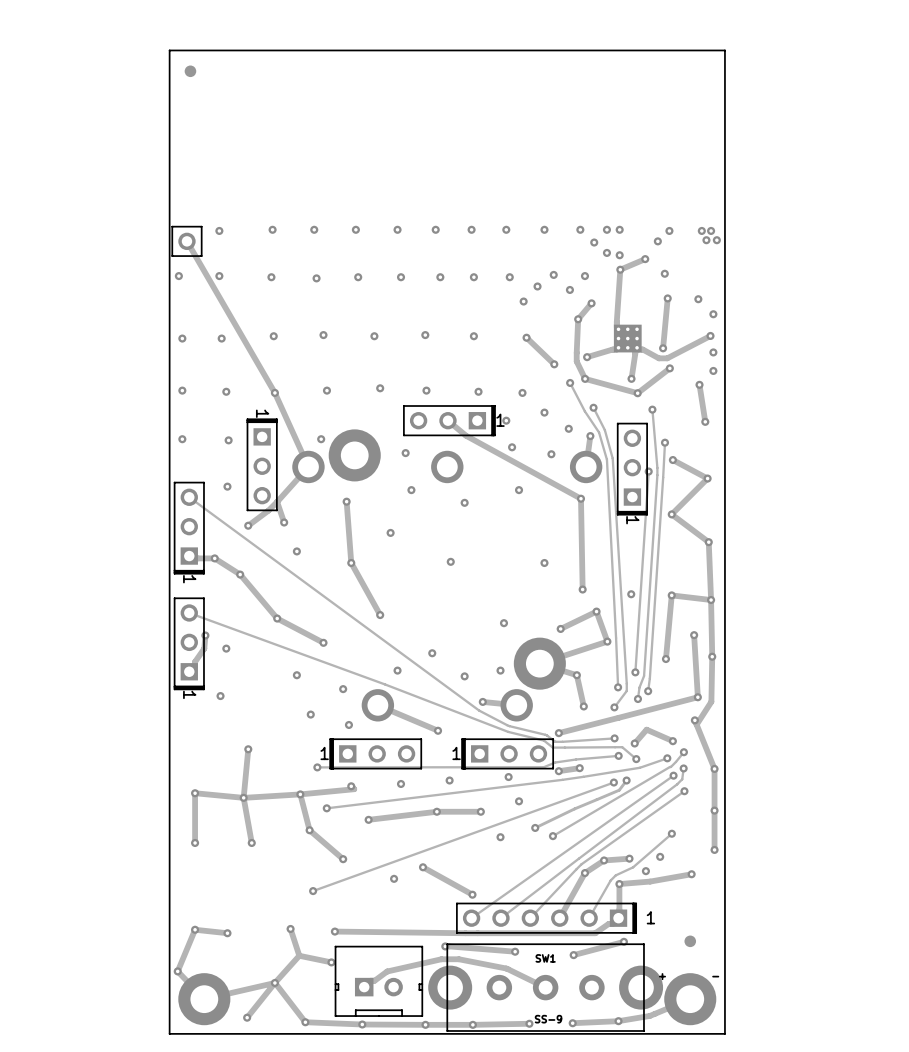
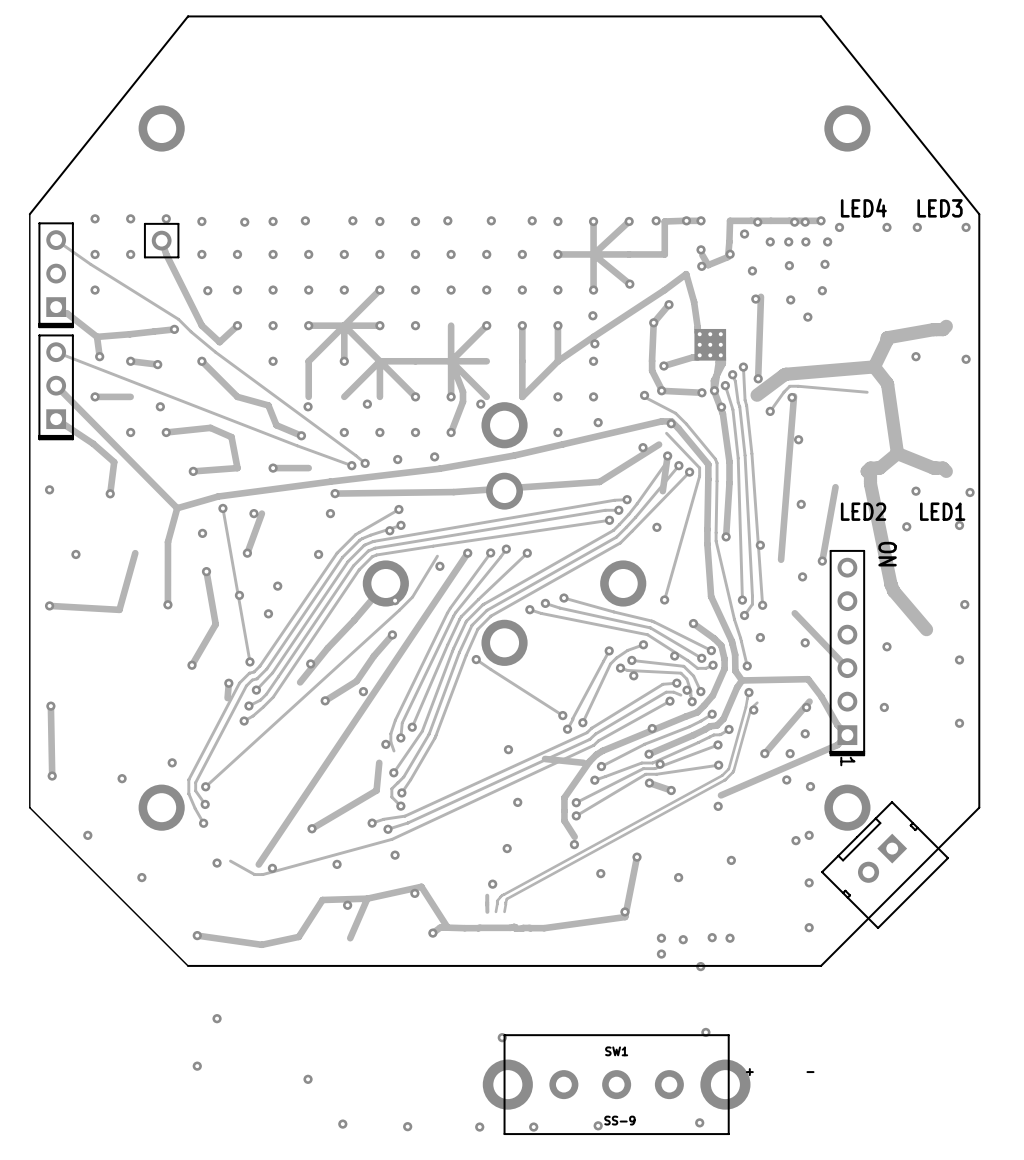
board edge: (724, 50) (724, 1033) (169, 1033) (169, 50) -> (821, 16) (979, 214) (979, 807) (821, 965) (188, 965) (29, 807) (29, 214) (188, 16)
part: (190, 71) -> none
part: none -> (161, 128)
part: none -> (847, 128)
text: none -> LED4 (863, 208)
text: none -> LED3 (940, 208)
via: none -> (95, 218)
via: none -> (130, 218)
via: none -> (166, 218)
via: (355, 229) -> none
via: (506, 229) -> none
via: (544, 229) -> none
track: none -> (701, 220) (664, 221) (664, 254) (557, 254)
track: none -> (821, 220) (730, 220) (728, 257) (708, 265) (702, 255)
via: none -> (821, 220)
via: none -> (201, 221)
via: none -> (273, 221)
via: none -> (379, 221)
via: none -> (415, 221)
via: none -> (557, 221)
track: none -> (593, 221) (593, 290)
via: none -> (593, 221)
track: none -> (629, 221) (593, 254) (629, 284)
via: none -> (629, 221)
via: none -> (839, 227)
via: none -> (886, 227)
via: none -> (917, 227)
via: none -> (966, 227)
via: (706, 240) -> none
via: (716, 240) -> none
track: (186, 241) (274, 392) (308, 466) (277, 501) -> none
part position: (186, 241) -> (161, 240)
via: (594, 242) -> none
track: none -> (56, 240) (90, 264) (178, 319) (215, 352) (365, 463)
track: none -> (161, 240) (166, 254) (201, 325) (219, 342) (237, 325)
via: none -> (770, 241)
via: none -> (788, 241)
via: none -> (805, 241)
via: none -> (827, 241)
via: (606, 252) -> none
via: none -> (95, 254)
via: none -> (130, 254)
via: none -> (201, 254)
via: none -> (237, 254)
via: none -> (273, 254)
via: none -> (308, 254)
via: none -> (344, 254)
via: none -> (379, 254)
via: none -> (415, 254)
via: none -> (451, 254)
via: none -> (486, 254)
via: none -> (522, 254)
via: none -> (557, 254)
track: (645, 259) (620, 269) (616, 323) -> (557, 361) (686, 274) (694, 302) (697, 327)
via: none -> (824, 264)
via: none -> (789, 265)
via: (553, 274) -> none
via: (178, 276) -> none
via: (219, 276) -> none
via: (584, 276) -> none
part: none -> (56, 275)
via: (271, 277) -> none
via: (358, 277) -> none
via: (401, 277) -> none
via: (440, 277) -> none
via: (473, 277) -> none
via: (509, 277) -> none
via: (316, 278) -> none
via: none -> (629, 284)
via: (537, 286) -> none
via: (569, 289) -> none
via: none -> (95, 290)
via: none -> (237, 290)
via: none -> (273, 290)
via: none -> (308, 290)
via: none -> (344, 290)
track: none -> (379, 290) (308, 361) (308, 396)
via: none -> (379, 290)
via: none -> (415, 290)
via: none -> (451, 290)
via: none -> (486, 290)
via: none -> (522, 290)
via: none -> (557, 290)
via: none -> (593, 290)
via: none -> (207, 290)
via: none -> (822, 290)
track: none -> (760, 296) (758, 374)
track: (667, 298) (663, 348) -> none
via: (523, 301) -> none
track: none -> (56, 307) (97, 336)
via: none -> (592, 315)
via: none -> (237, 325)
via: none -> (273, 325)
track: none -> (379, 325) (308, 325)
via: none -> (379, 325)
track: none -> (451, 325) (451, 396)
track: none -> (486, 325) (451, 361)
track: none -> (522, 325) (522, 396) (557, 361)
via: none -> (522, 325)
track: none -> (557, 325) (557, 361)
via: none -> (557, 325)
track: none -> (946, 326) (943, 329) (887, 337) (874, 366)
track: none -> (174, 329) (97, 336)
via: none -> (174, 329)
track: none -> (97, 336) (99, 356)
via: (323, 335) -> none
via position: (425, 335) -> (486, 325)
track: (710, 335) (667, 358) (658, 358) (642, 349) (638, 349) -> (726, 536) (729, 461) (722, 413) (713, 390) (713, 380) (722, 363) (722, 357)
via: (710, 335) -> none
via position: (273, 336) -> (308, 325)
via position: (374, 336) -> (415, 325)
via: (473, 336) -> none
track: (526, 337) (554, 364) -> none
via: (182, 338) -> none
via: (221, 338) -> none
track: none -> (56, 352) (351, 465)
via: none -> (99, 356)
via: (663, 348) -> none
via: none -> (915, 356)
via: none -> (966, 359)
via: (713, 352) -> none
track: none -> (130, 361) (157, 364)
via: none -> (130, 361)
track: none -> (201, 361) (237, 396) (268, 405) (276, 425) (301, 435)
via: none -> (201, 361)
via: none -> (273, 361)
track: none -> (344, 361) (344, 325) (415, 396)
via: none -> (344, 361)
track: none -> (379, 361) (379, 396)
track: none -> (379, 361) (344, 396)
track: none -> (451, 361) (486, 396)
track: none -> (451, 361) (463, 391) (463, 401) (451, 432)
track: none -> (486, 361) (379, 361)
via: none -> (593, 361)
via: none -> (157, 364)
track: none -> (874, 366) (785, 374) (757, 395)
track: none -> (874, 366) (887, 384) (897, 453)
track: none -> (743, 367) (762, 605)
via: none -> (743, 367)
track: (576, 361) (585, 378) (637, 393) (669, 368) -> (652, 370) (662, 390) (701, 392)
via: (554, 364) -> none
track: none -> (732, 374) (739, 406) (745, 455) (752, 595) (752, 604) (744, 615)
via: none -> (732, 374)
via: (713, 370) -> none
track: none -> (56, 385) (177, 508)
track: none -> (725, 385) (732, 409) (738, 458) (742, 600)
via: none -> (725, 385)
part: none -> (56, 387)
via: none -> (701, 392)
track: none -> (867, 392) (789, 386) (770, 411)
track: (570, 382) (584, 411) (599, 432) (606, 459) (618, 687) -> none
track: none -> (642, 396) (675, 413) (717, 463) (716, 541) (747, 666)
track: none -> (794, 396) (781, 559)
via: none -> (95, 396)
track: none -> (130, 396) (95, 396)
via: none -> (415, 396)
via: none -> (451, 396)
via: none -> (557, 396)
via: none -> (593, 396)
track: (699, 384) (705, 421) -> none
via: (380, 388) -> none
via: (182, 390) -> none
via: (226, 391) -> none
via: (478, 391) -> none
via: none -> (160, 406)
via: (522, 392) -> none
via: none -> (770, 411)
track: none -> (56, 419) (93, 443) (114, 462) (110, 493)
via: none -> (598, 422)
track: (593, 407) (604, 430) (612, 458) (626, 683) (626, 690) (614, 707) -> none
part: none -> (504, 425)
track: (652, 409) (657, 475) (644, 675) (637, 699) -> none
via: (652, 409) -> none
via: (544, 412) -> none
via: none -> (130, 432)
track: none -> (166, 432) (210, 427) (231, 437) (237, 468) (193, 471)
via: none -> (166, 432)
via: none -> (344, 432)
via: none -> (379, 432)
via: none -> (415, 432)
via: none -> (451, 432)
track: none -> (666, 433) (699, 467) (699, 476) (664, 599)
via: none -> (301, 435)
track: (447, 420) (466, 435) (580, 498) (582, 589) -> none
part: (449, 420) -> none
via position: (506, 420) -> (557, 432)
track: none -> (659, 444) (599, 481) (453, 492) (335, 493)
track: none -> (897, 453) (933, 468) (943, 468) (946, 471)
track: none -> (897, 453) (879, 468) (870, 468) (867, 471) (870, 474) (870, 484) (891, 584) (893, 591) (926, 629)
via: none -> (434, 456)
via position: (182, 439) -> (193, 471)
via: (321, 439) -> none
via: none -> (397, 459)
via position: (228, 440) -> (273, 468)
track: none -> (666, 462) (637, 503) (613, 530) (482, 604) (466, 620) (452, 651) (422, 731) (393, 772)
via: none -> (365, 463)
track: (665, 442) (648, 691) -> none
via: (665, 442) -> none
via: none -> (351, 465)
track: none -> (678, 465) (616, 537) (486, 610) (472, 625) (459, 652)
via: none -> (678, 465)
track: none -> (308, 468) (273, 468)
via: (512, 447) -> none
track: none -> (689, 472) (620, 542) (490, 616) (477, 629) (434, 738) (401, 792)
via: none -> (689, 472)
via: (405, 453) -> none
via: (551, 454) -> none
part: (354, 455) -> none
track: (672, 460) (707, 478) (671, 514) (708, 542) (711, 600) -> none
via: (672, 460) -> none
track: none -> (835, 487) (822, 561)
part: (262, 464) -> none
via: none -> (49, 489)
part: (308, 466) -> none
part: (586, 466) -> none
via: none -> (915, 491)
via: none -> (970, 492)
via: none -> (110, 493)
via: none -> (335, 493)
part: (632, 469) -> none
track: (648, 471) (635, 672) -> none
via: (648, 471) -> none
track: none -> (627, 499) (374, 541) (365, 544) (347, 561) (272, 672) (256, 690)
via: none -> (627, 499)
track: none -> (177, 508) (167, 542) (167, 604)
track: none -> (177, 508) (218, 496) (439, 468) (514, 455) (661, 421) (671, 421) (708, 464) (707, 544) (711, 596) (731, 641) (735, 654) (735, 671) (742, 680)
track: none -> (222, 508) (249, 661)
via: none -> (222, 508)
track: none -> (398, 509) (355, 534) (337, 553) (259, 666) (254, 671) (249, 673)
via: none -> (398, 509)
track: none -> (618, 510) (605, 510) (375, 548) (368, 550) (353, 565) (266, 694) (260, 700) (248, 706)
via: none -> (618, 510)
text: none -> LED2 (863, 511)
text: none -> LED1 (942, 511)
track: none -> (261, 513) (247, 553)
via: none -> (330, 513)
via: (411, 490) -> none
via: (519, 490) -> none
track: none -> (609, 520) (372, 556) (359, 569) (273, 697) (253, 716) (244, 721)
via: none -> (609, 520)
track: none -> (401, 525) (362, 538) (342, 557) (266, 668) (246, 685) (195, 782) (195, 790) (205, 804)
via: none -> (401, 525)
track: (189, 497) (479, 710) (509, 726) (545, 734) (555, 741) (614, 738) -> none
via: none -> (959, 525)
via: none -> (906, 526)
track: (277, 501) (248, 525) -> none
track: (277, 501) (284, 522) -> none
track: (346, 501) (351, 563) (380, 615) -> none
via: (464, 502) -> none
via: none -> (202, 533)
via: none -> (726, 536)
track: none -> (506, 549) (453, 616) (402, 723) (400, 737)
via: none -> (506, 549)
track: none -> (135, 553) (119, 609) (49, 605)
via: none -> (247, 553)
track: none -> (467, 553) (258, 864)
via: none -> (467, 553)
track: none -> (490, 552) (447, 613) (395, 720) (390, 733) (390, 742) (394, 750)
via: none -> (490, 552)
track: none -> (527, 553) (461, 616) (412, 727)
via: none -> (527, 553)
via: none -> (75, 554)
text: none -> ON (887, 554)
track: none -> (437, 556) (412, 597) (399, 610) (205, 786)
via: (248, 525) -> none
part: (189, 528) -> none
via: none -> (822, 561)
track: none -> (206, 571) (215, 624) (191, 665)
via: none -> (206, 571)
track: none -> (385, 583) (327, 648) (300, 682)
part: none -> (385, 583)
part: none -> (623, 583)
via: none -> (277, 586)
via: (296, 551) -> none
track: (189, 556) (195, 558) (214, 558) (240, 574) (277, 618) (323, 642) -> none
track: none -> (563, 598) (651, 621) (711, 650)
via: none -> (563, 598)
via: (450, 561) -> none
via: none -> (664, 599)
via: none -> (742, 600)
via: (544, 563) -> none
track: none -> (545, 603) (650, 627) (701, 658)
via: none -> (545, 603)
via: none -> (167, 604)
via: none -> (964, 604)
via: none -> (49, 605)
via: none -> (762, 605)
track: none -> (529, 609) (647, 634) (697, 668) (705, 668) (713, 665)
via: none -> (529, 609)
track: none -> (794, 613) (847, 668)
via: none -> (744, 615)
track: none -> (693, 623) (721, 645) (724, 668) (712, 695) (697, 712) (602, 750) (589, 761) (564, 797) (564, 820) (574, 836)
via: none -> (693, 623)
via: (582, 589) -> none
track: none -> (392, 634) (373, 656) (356, 681) (325, 700)
via: none -> (392, 634)
via: (631, 594) -> none
part: none -> (504, 642)
track: (711, 600) (711, 701) (696, 724) -> none
track: (711, 600) (671, 595) (665, 659) -> none
track: none -> (643, 644) (627, 650) (610, 663) (582, 722)
via: none -> (643, 644)
via: none -> (886, 646)
via: none -> (711, 650)
track: none -> (609, 650) (567, 729)
via: none -> (609, 650)
track: none -> (459, 652) (429, 734) (403, 776) (391, 788) (391, 797) (400, 806)
part: none -> (847, 653)
track: (189, 612) (508, 731) (543, 740) (552, 747) (622, 747) (636, 759) -> none
via: none -> (701, 658)
track: none -> (476, 659) (562, 715)
via: none -> (476, 659)
via: (380, 615) -> none
track: none -> (631, 660) (683, 666)
via: none -> (631, 660)
via: none -> (959, 659)
via: none -> (249, 661)
via: none -> (191, 665)
via: none -> (713, 665)
track: none -> (683, 666) (693, 676) (700, 691)
via: none -> (747, 666)
track: none -> (620, 668) (627, 670) (680, 673) (686, 679) (692, 701)
via: none -> (620, 668)
via: (503, 623) -> none
track: none -> (249, 673) (239, 683) (188, 779)
track: (560, 628) (596, 611) (607, 641) (539, 663) (576, 675) (583, 706) -> none
track: none -> (742, 680) (808, 679) (821, 696) (837, 725) (847, 735) (837, 745) (721, 795)
track: none -> (742, 680) (723, 718) (716, 725) (709, 726) (649, 754)
track: none -> (676, 683) (663, 684)
via: none -> (676, 683)
track: (694, 635) (697, 697) (558, 733) -> none
via: (694, 635) -> none
track: none -> (662, 684) (587, 732) (405, 816) (372, 823)
via: none -> (256, 690)
via: none -> (700, 691)
part: (189, 643) -> none
track: none -> (748, 692) (728, 769) (722, 775) (502, 895) (497, 901) (495, 911)
via: none -> (748, 692)
track: none -> (680, 695) (666, 692) (595, 733) (589, 739) (407, 822) (388, 829)
track: (204, 648) (195, 661) (195, 665) (189, 671) -> none
via: (226, 648) -> none
track: none -> (669, 701) (598, 740) (593, 745) (392, 839) (262, 874) (254, 874) (230, 861)
via: none -> (669, 701)
via: none -> (692, 701)
track: none -> (809, 701) (764, 753)
track: none -> (757, 702) (751, 708) (733, 771) (725, 779) (506, 899) (504, 911)
via: (432, 653) -> none
track: none -> (50, 706) (52, 776)
via: none -> (50, 706)
via: none -> (248, 706)
via: none -> (884, 707)
track: none -> (712, 714) (689, 726) (644, 744) (601, 766)
via: none -> (712, 714)
via: none -> (562, 715)
part: (539, 663) -> none
via: none -> (244, 721)
via: (397, 670) -> none
via: (500, 670) -> none
via: none -> (582, 722)
via: none -> (959, 723)
via: (635, 672) -> none
via: none -> (412, 727)
via position: (296, 675) -> (325, 700)
via: none -> (567, 729)
via: (464, 676) -> none
track: none -> (729, 729) (652, 763) (641, 763) (594, 780)
via: none -> (729, 729)
via: none -> (805, 733)
via: none -> (400, 737)
via: (618, 687) -> none
track: none -> (718, 744) (655, 768) (643, 768) (576, 802)
via: none -> (718, 744)
via: (648, 691) -> none
via: none -> (508, 749)
via: (220, 696) -> none
via: none -> (649, 754)
via: none -> (764, 753)
via: (637, 699) -> none
via: (482, 701) -> none
via: none -> (172, 762)
track: none -> (379, 762) (376, 790) (312, 828)
track: (377, 705) (438, 730) -> none
part: (377, 705) -> none
part: (516, 705) -> none
via: (614, 707) -> none
track: none -> (718, 765) (645, 774) (576, 815)
via: none -> (718, 765)
via: none -> (601, 766)
via: (310, 714) -> none
via: none -> (393, 772)
via: none -> (52, 776)
via: none -> (122, 778)
track: none -> (188, 779) (188, 793) (203, 823)
via: none -> (594, 780)
track: none -> (649, 783) (671, 790)
via: none -> (649, 783)
via: (348, 724) -> none
track: (696, 724) (714, 768) (714, 849) -> none
via: none -> (205, 786)
via: none -> (810, 786)
via: none -> (671, 790)
via: (438, 730) -> none
via: none -> (401, 792)
via: (558, 733) -> none
via: (614, 738) -> none
via: none -> (517, 802)
via: none -> (576, 802)
via: none -> (205, 804)
track: (672, 741) (646, 729) (634, 743) -> none
via: (672, 741) -> none
via: none -> (400, 806)
part: none -> (161, 807)
part: none -> (847, 807)
track: (248, 749) (243, 797) -> none
via: (248, 749) -> none
via: none -> (576, 815)
track: (683, 752) (670, 766) (552, 836) -> none
via: (683, 752) -> none
part: (375, 753) -> none
part: (507, 753) -> none
track: (618, 755) (555, 762) (543, 767) (317, 767) -> none
via: (618, 755) -> none
via: none -> (203, 823)
via: none -> (372, 823)
track: (667, 758) (639, 767) (583, 776) (326, 808) -> none
via: (667, 758) -> none
via: (636, 759) -> none
via: none -> (312, 828)
via: none -> (388, 829)
via: (317, 767) -> none
via: none -> (87, 835)
track: (579, 768) (558, 771) -> none
via: (579, 768) -> none
track: (683, 768) (682, 779) (677, 784) (500, 918) -> none
via: (683, 768) -> none
via: (558, 771) -> none
via: none -> (795, 840)
track: (673, 775) (471, 918) -> none
via: (673, 775) -> none
track: (626, 780) (619, 790) (535, 827) -> none
via: (626, 780) -> none
track: (613, 782) (313, 891) -> none
via: (613, 782) -> none
via: (401, 783) -> none
track: (351, 786) (354, 789) (300, 794) -> none
track: none -> (637, 857) (625, 917) (544, 928) (515, 928) (514, 926)
via: none -> (637, 857)
via: none -> (731, 860)
track: (684, 791) (581, 864) (530, 918) -> none
via: (684, 791) -> none
track: (300, 794) (243, 797) -> none
track: (300, 794) (309, 830) (343, 859) -> none
part: none -> (885, 865)
track: (243, 797) (195, 793) (195, 842) -> none
track: (243, 797) (251, 842) -> none
via: (519, 801) -> none
via: none -> (600, 873)
via: none -> (141, 877)
via: none -> (678, 877)
via: (326, 808) -> none
track: (480, 811) (436, 811) (368, 819) -> none
via: (480, 811) -> none
track: none -> (487, 895) (487, 911)
track: none -> (367, 898) (421, 886) (447, 927)
track: none -> (367, 898) (350, 938)
track: none -> (367, 898) (322, 899) (298, 936) (261, 944) (197, 935)
via: (535, 827) -> none
track: (671, 833) (633, 867) (615, 875) (610, 880) (589, 918) -> none
via: (671, 833) -> none
via: (500, 837) -> none
via position: (195, 842) -> (197, 935)
via: (251, 842) -> none
track: none -> (447, 927) (440, 927) (432, 933)
track: none -> (514, 926) (447, 927)
via: none -> (432, 933)
via: (660, 856) -> none
track: (629, 858) (604, 860) (584, 873) (559, 918) -> none
via: (343, 859) -> none
via: none -> (661, 938)
via: none -> (730, 938)
track: (423, 867) (472, 894) -> none
via: (423, 867) -> none
via: (645, 871) -> none
track: (691, 874) (650, 881) (619, 884) (618, 918) (612, 923) (608, 923) (595, 933) -> none
via: (691, 874) -> none
via: (394, 878) -> none
via: (313, 891) -> none
via: (472, 894) -> none
part: (546, 918) -> none
track: (290, 928) (299, 955) -> none
via: (290, 928) -> none
track: (334, 931) (595, 933) -> none
via: (334, 931) -> none
track: (227, 933) (195, 929) (177, 971) (204, 999) (274, 982) -> none
via: (227, 933) -> none
track: (623, 941) (573, 955) -> none
part: (690, 941) -> none
track: (445, 946) (515, 951) -> none
via: (515, 951) -> none
track: (299, 955) (274, 982) -> none
track: (299, 955) (331, 962) -> none
via: (573, 955) -> none
via: (331, 962) -> none
part: (378, 981) -> none
track: (274, 982) (305, 1022) (362, 1024) (529, 1023) -> none
track: (274, 982) (247, 1017) -> none
track: (364, 987) (370, 980) (374, 980) (387, 971) (441, 959) (458, 959) (506, 968) (545, 987) -> none
part: (204, 999) -> none
track: (690, 999) (649, 1015) (618, 1021) (572, 1023) -> none
part: (690, 999) -> none
via: (247, 1017) -> none
via: (572, 1023) -> none

